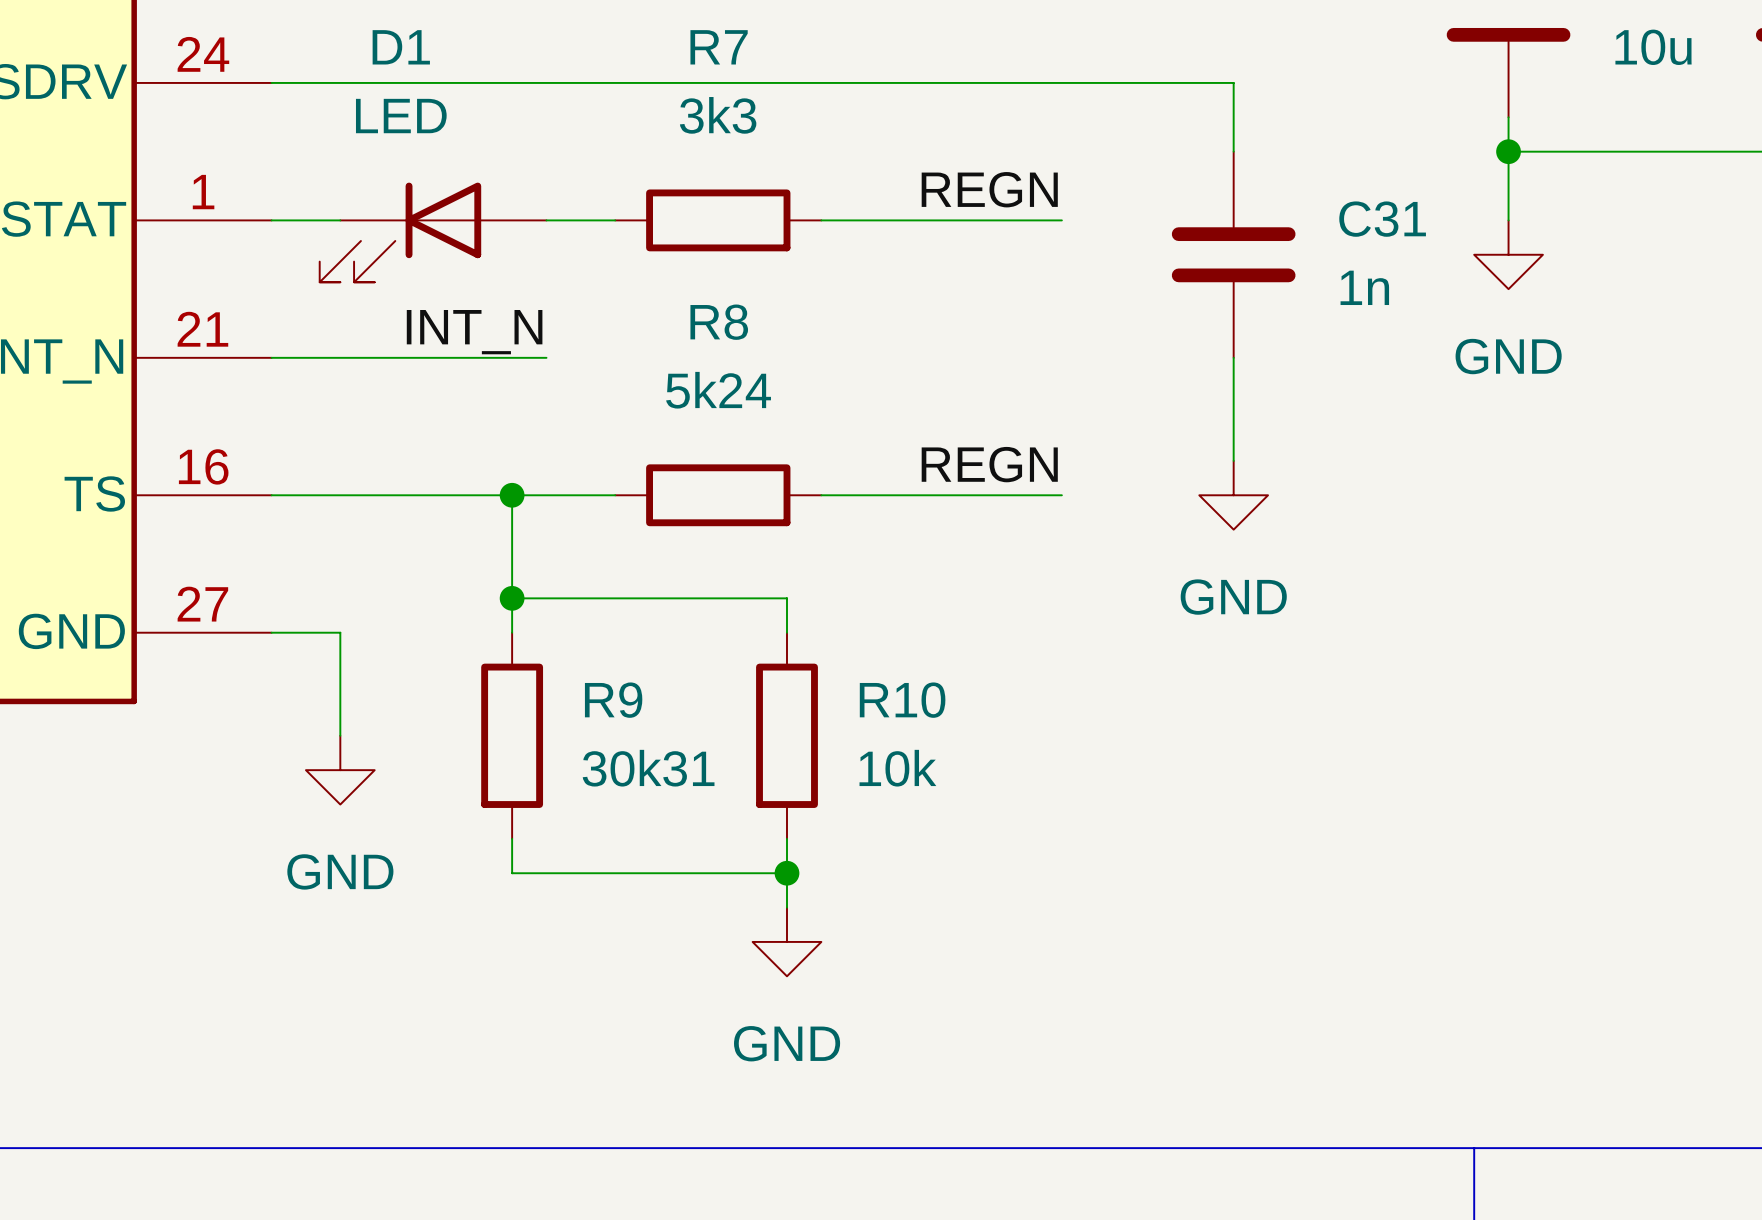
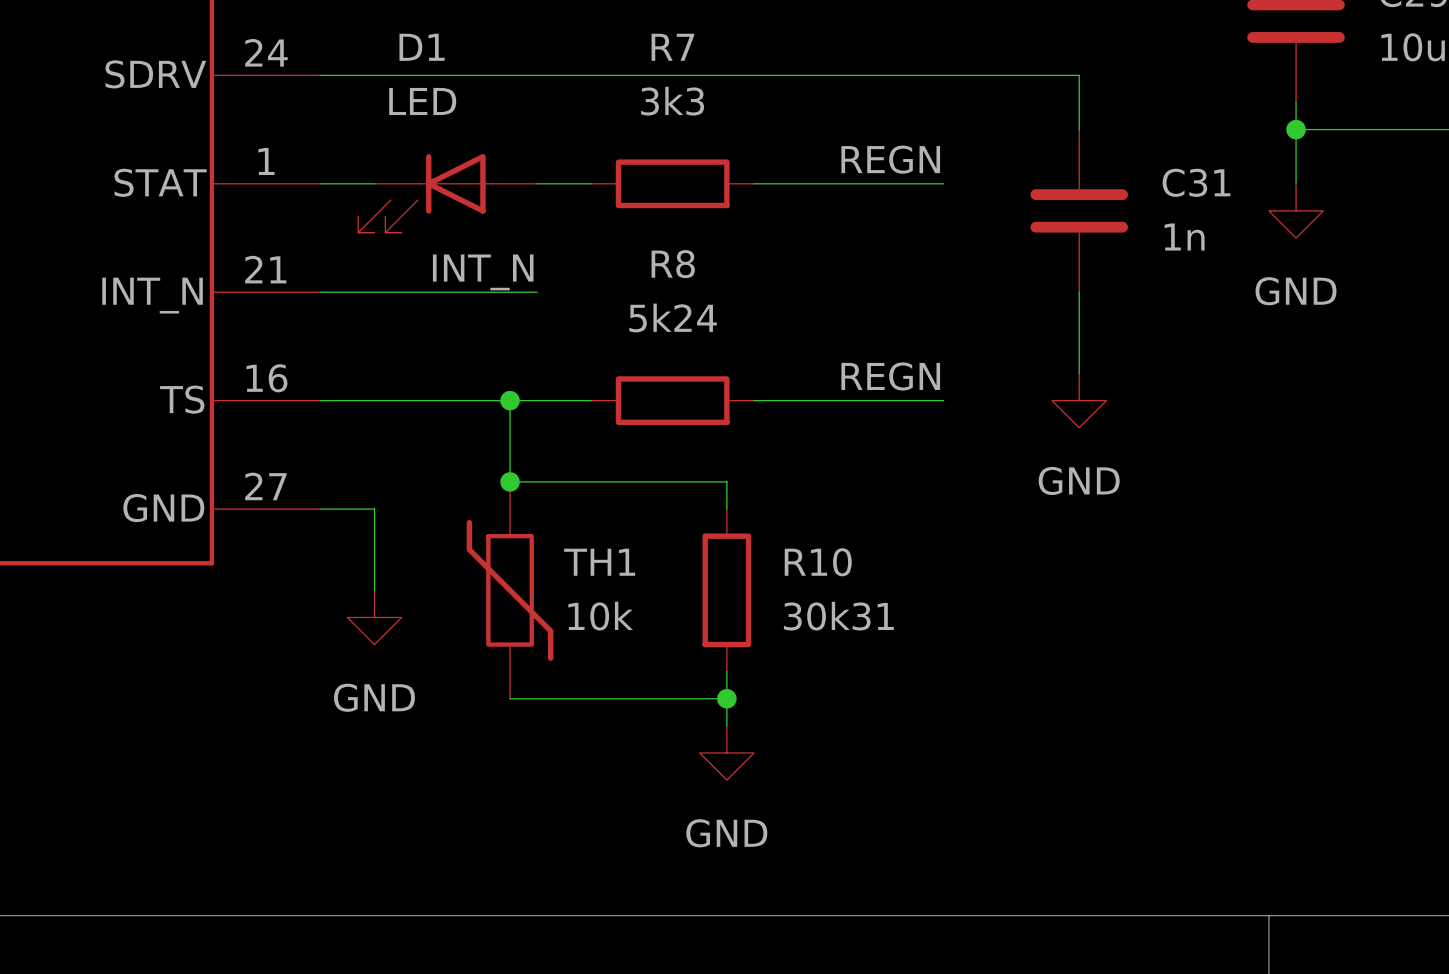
R9: 30k31 (512, 735) -> none
TH1: none -> 10k (510, 590)
R10 value: 10k (897, 768) -> 30k31 (838, 616)

